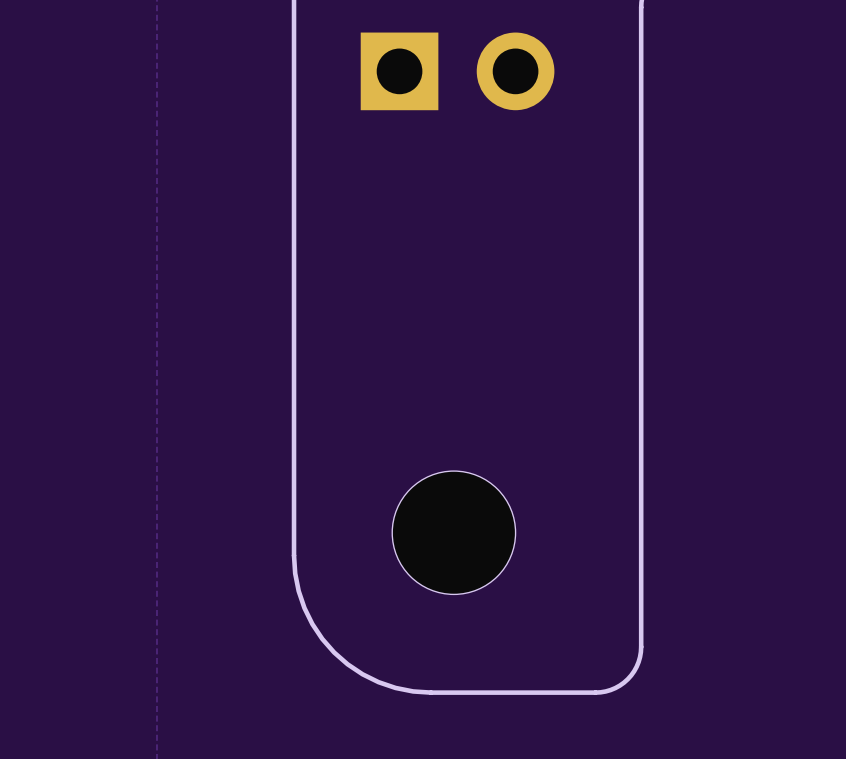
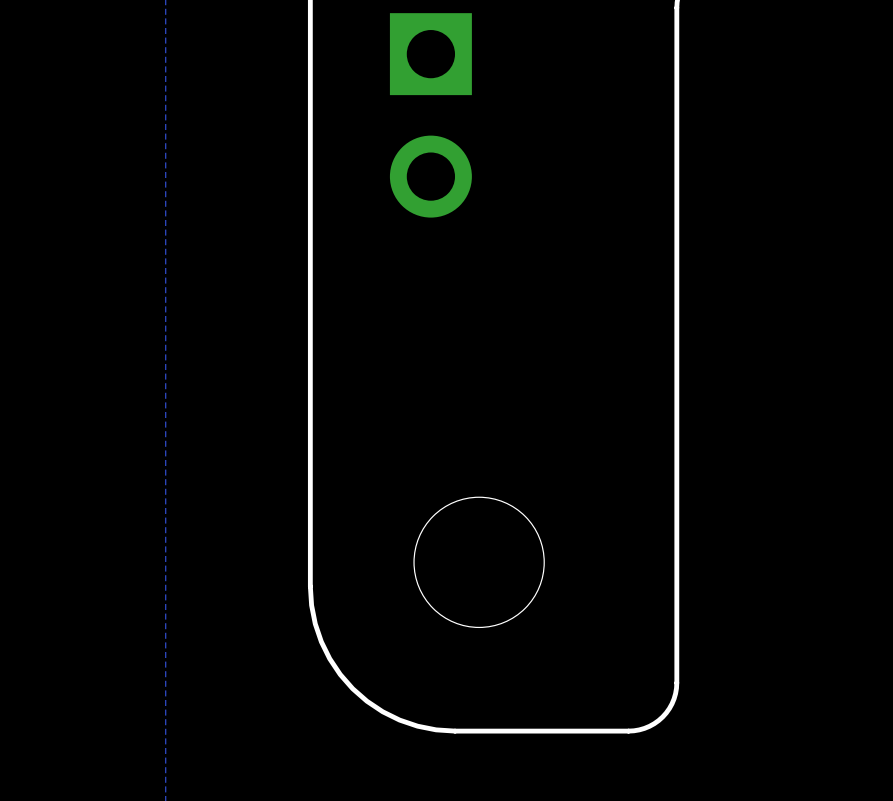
part rotation: 0° (457, 71) -> 90° clockwise (430, 115)

